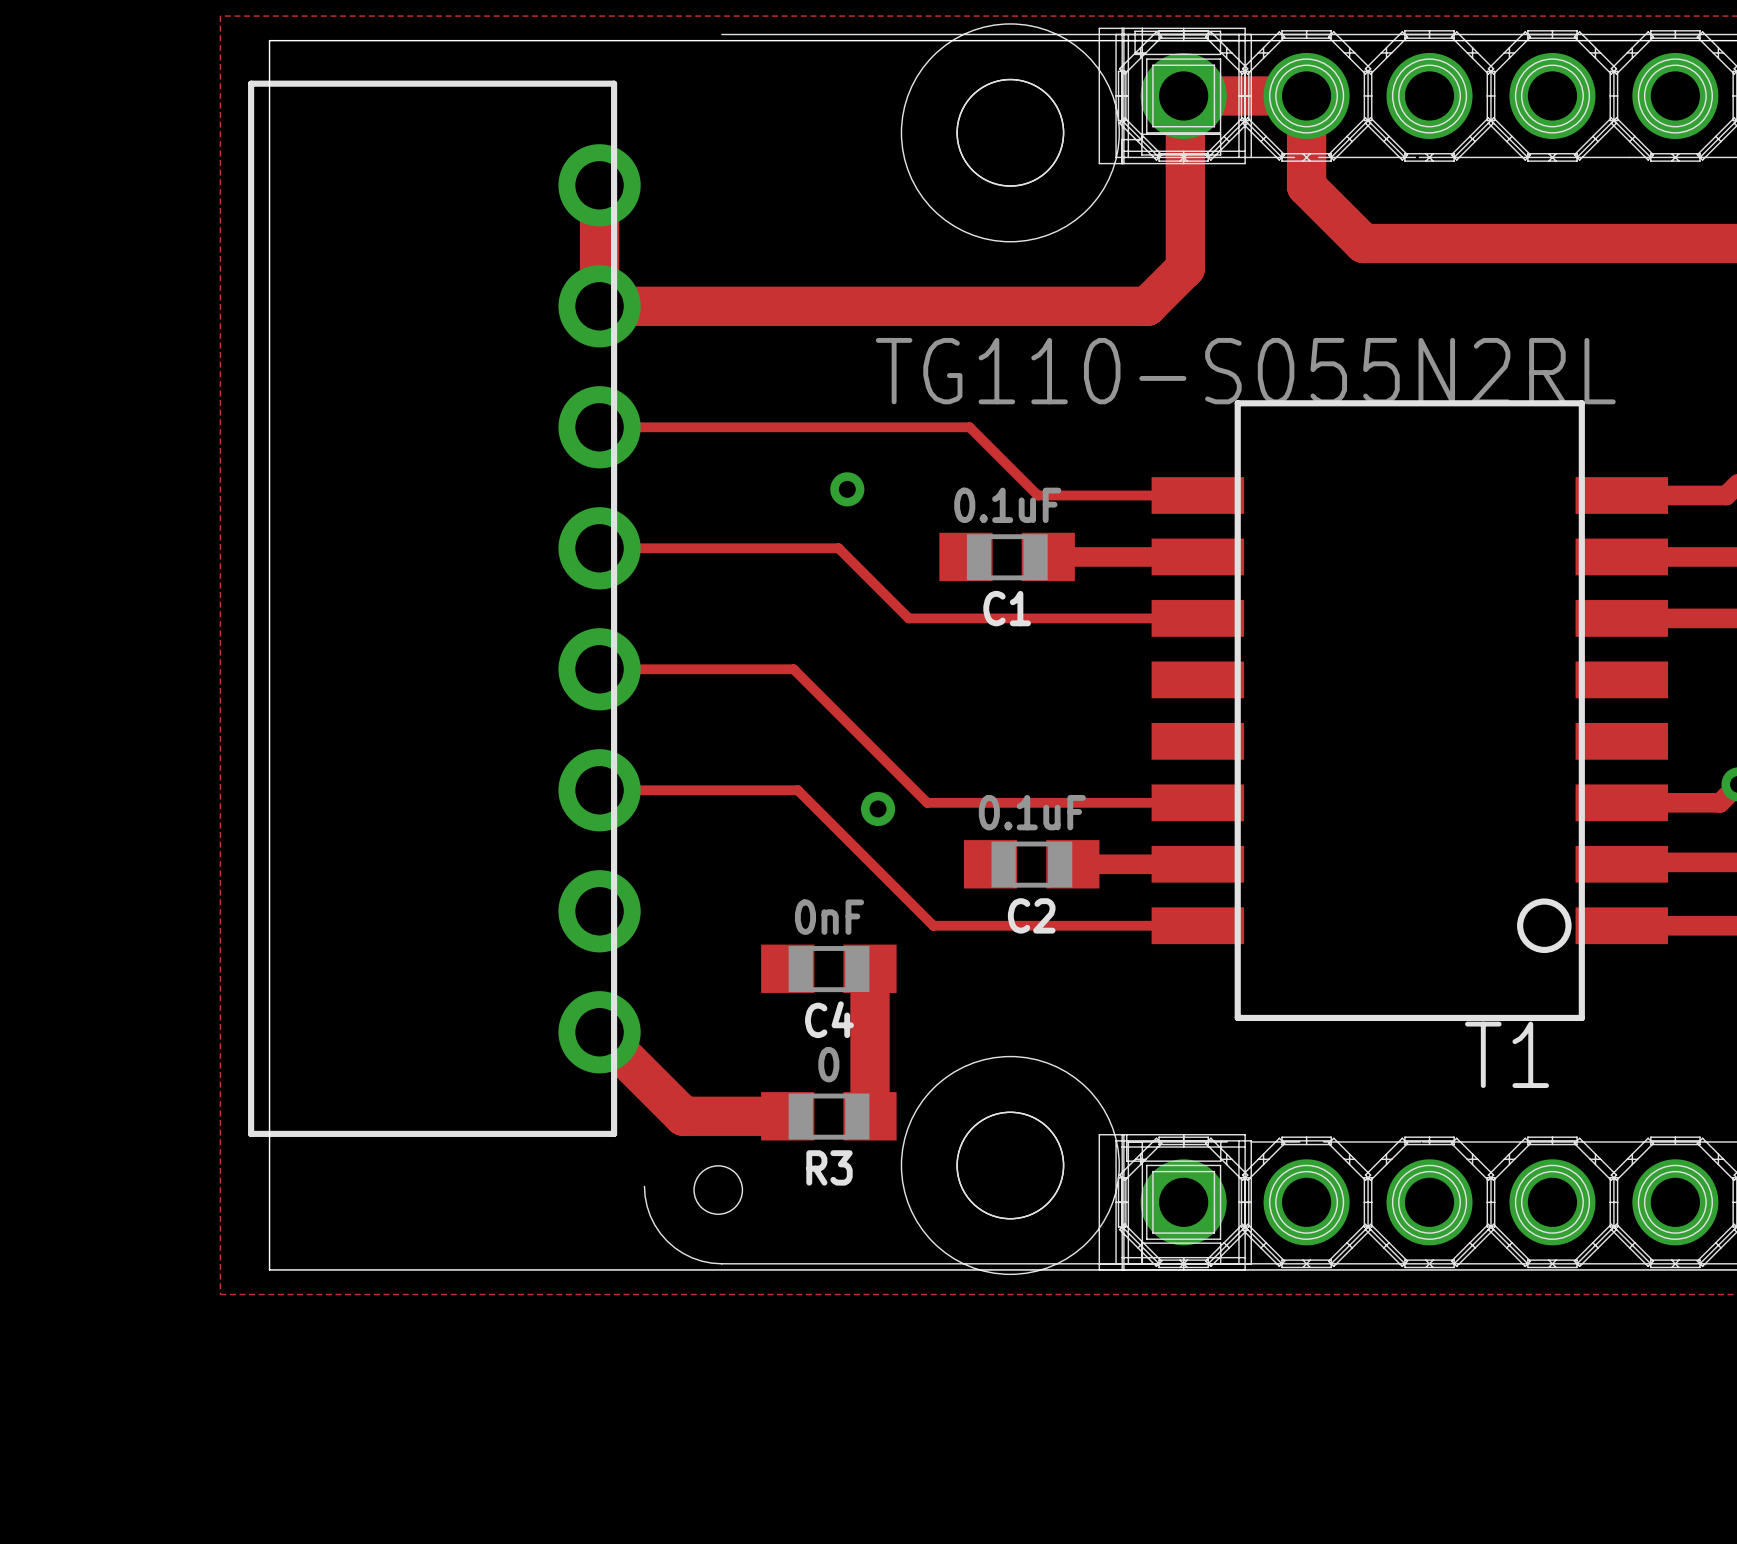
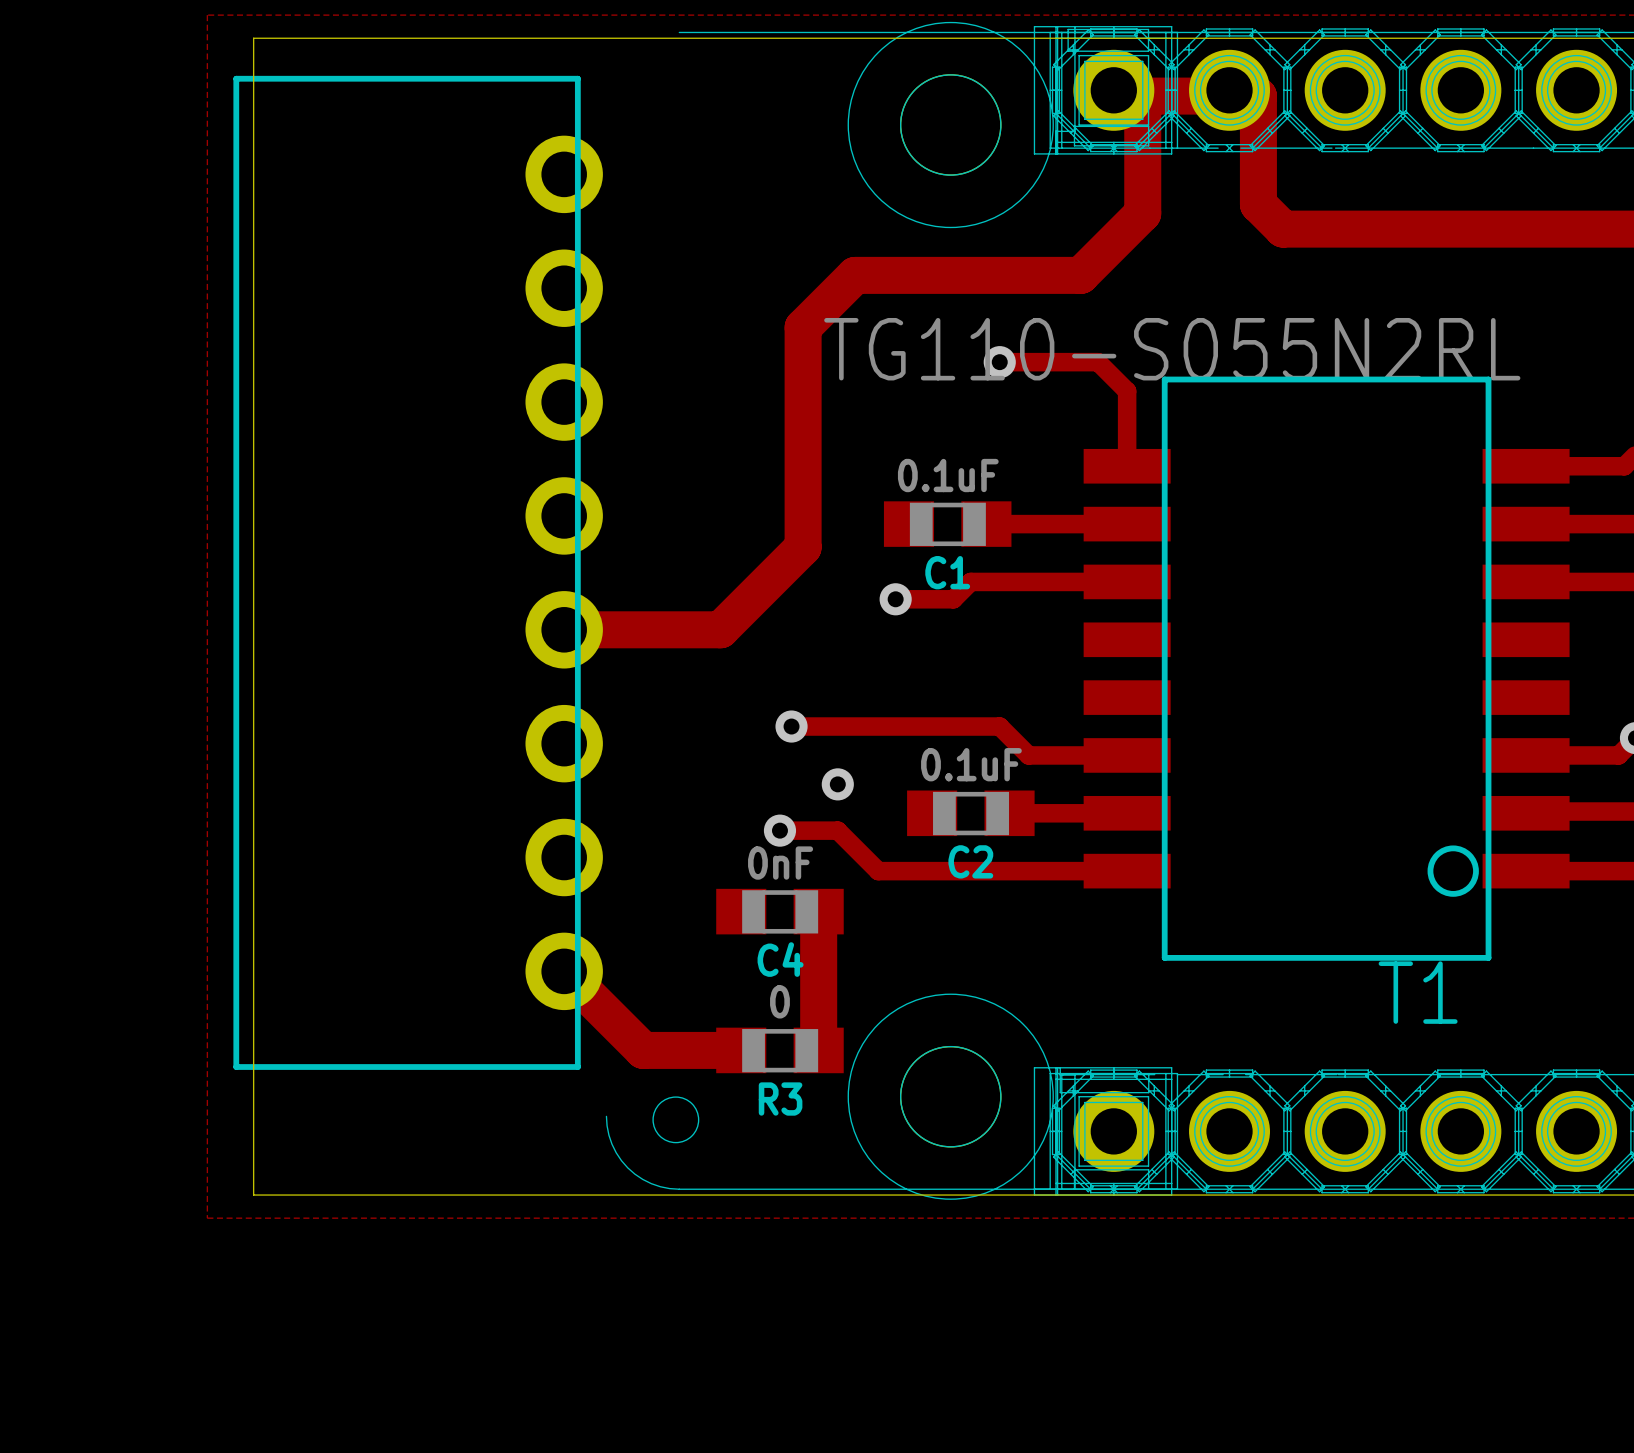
track: (599, 185) (599, 306) (1147, 306) (1185, 268) (1185, 97) (1183, 95) (1306, 95) (1306, 186) (1337, 217) -> (720, 629) (803, 547) (803, 327) (855, 275) (1080, 275) (1142, 213) (1142, 96) (1258, 96) (1258, 204)
via: none -> (999, 362)
track: (599, 427) (969, 427) (1037, 495) (1197, 495) -> (999, 362) (1098, 362) (1127, 391) (1127, 466)
via: (847, 489) -> none
track: (599, 548) (838, 548) (908, 618) (1031, 618) -> (895, 599) (953, 599) (970, 581)
track width: thin (1031, 618) (1197, 618) -> thick (970, 581) (1127, 581)
via: none -> (895, 599)
track width: thin (599, 669) (765, 669) -> thick (564, 629) (720, 629)
track: (765, 669) (793, 669) (927, 802) (1093, 802) -> (791, 726) (999, 726) (1028, 755)
via: none -> (791, 726)
track: (599, 790) (797, 790) (890, 882) -> (779, 830) (837, 830)
track width: thin (1093, 802) (1197, 802) -> thick (1028, 755) (1127, 755)
via position: (878, 808) -> (837, 784)
via: none -> (779, 830)
track width: thin (890, 882) (933, 925) (1197, 925) -> thick (837, 830) (878, 871) (1127, 871)

